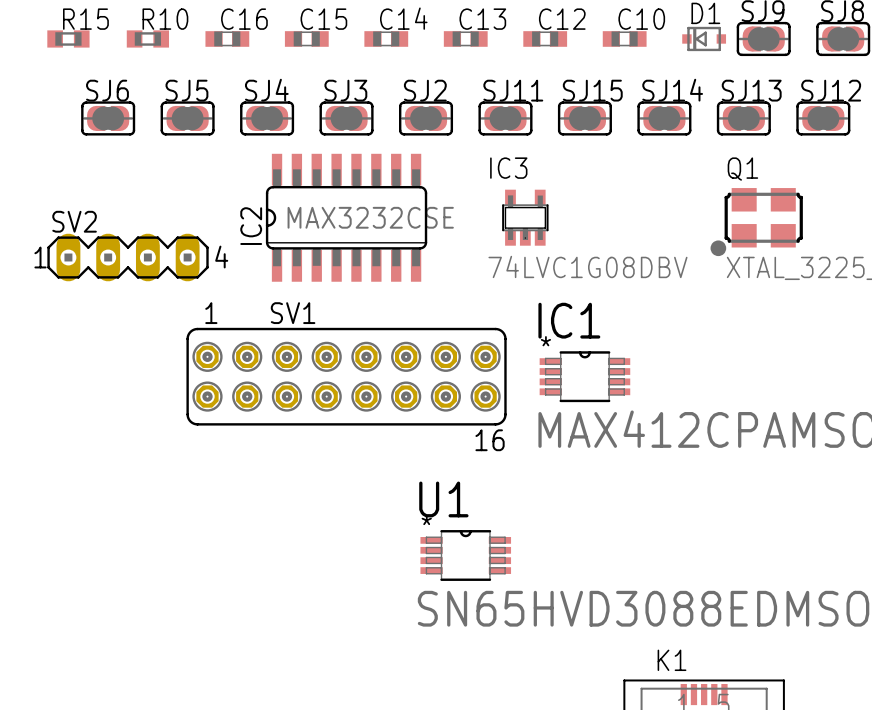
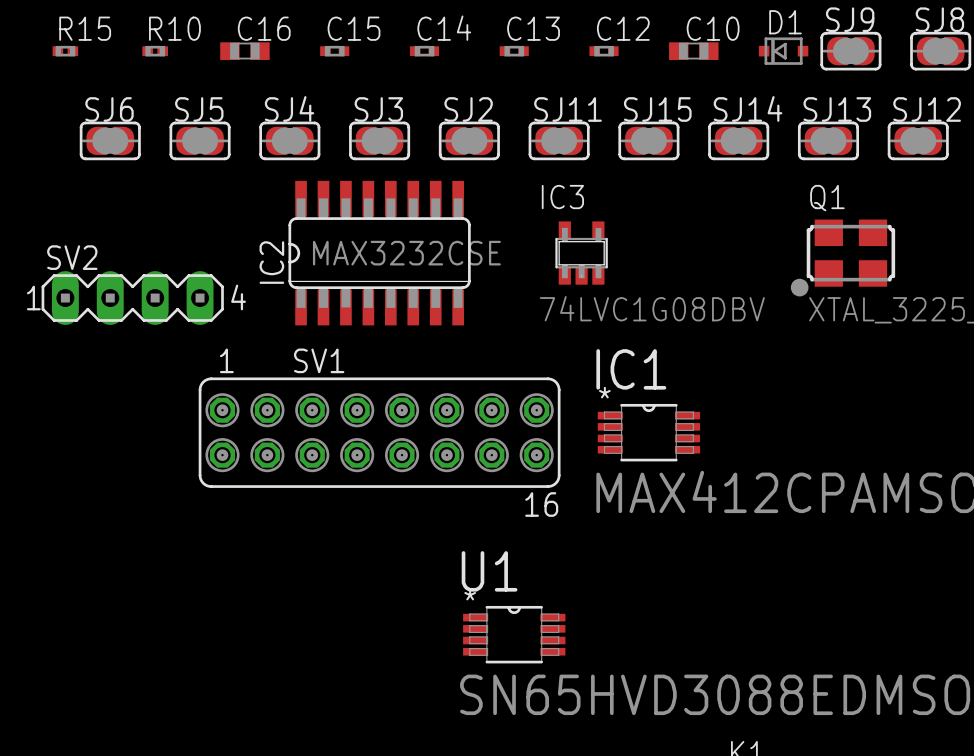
R15 footprint: [47, 30, 90, 48] -> [52, 45, 79, 57]
R10 footprint: [126, 30, 170, 48] -> [142, 45, 168, 57]
C15 footprint: [284, 31, 329, 47] -> [320, 45, 350, 57]
C14 footprint: [364, 31, 409, 47] -> [409, 45, 440, 57]
C13 footprint: [443, 31, 488, 47] -> [499, 45, 529, 57]
C12 footprint: [523, 31, 568, 47] -> [589, 45, 619, 57]

